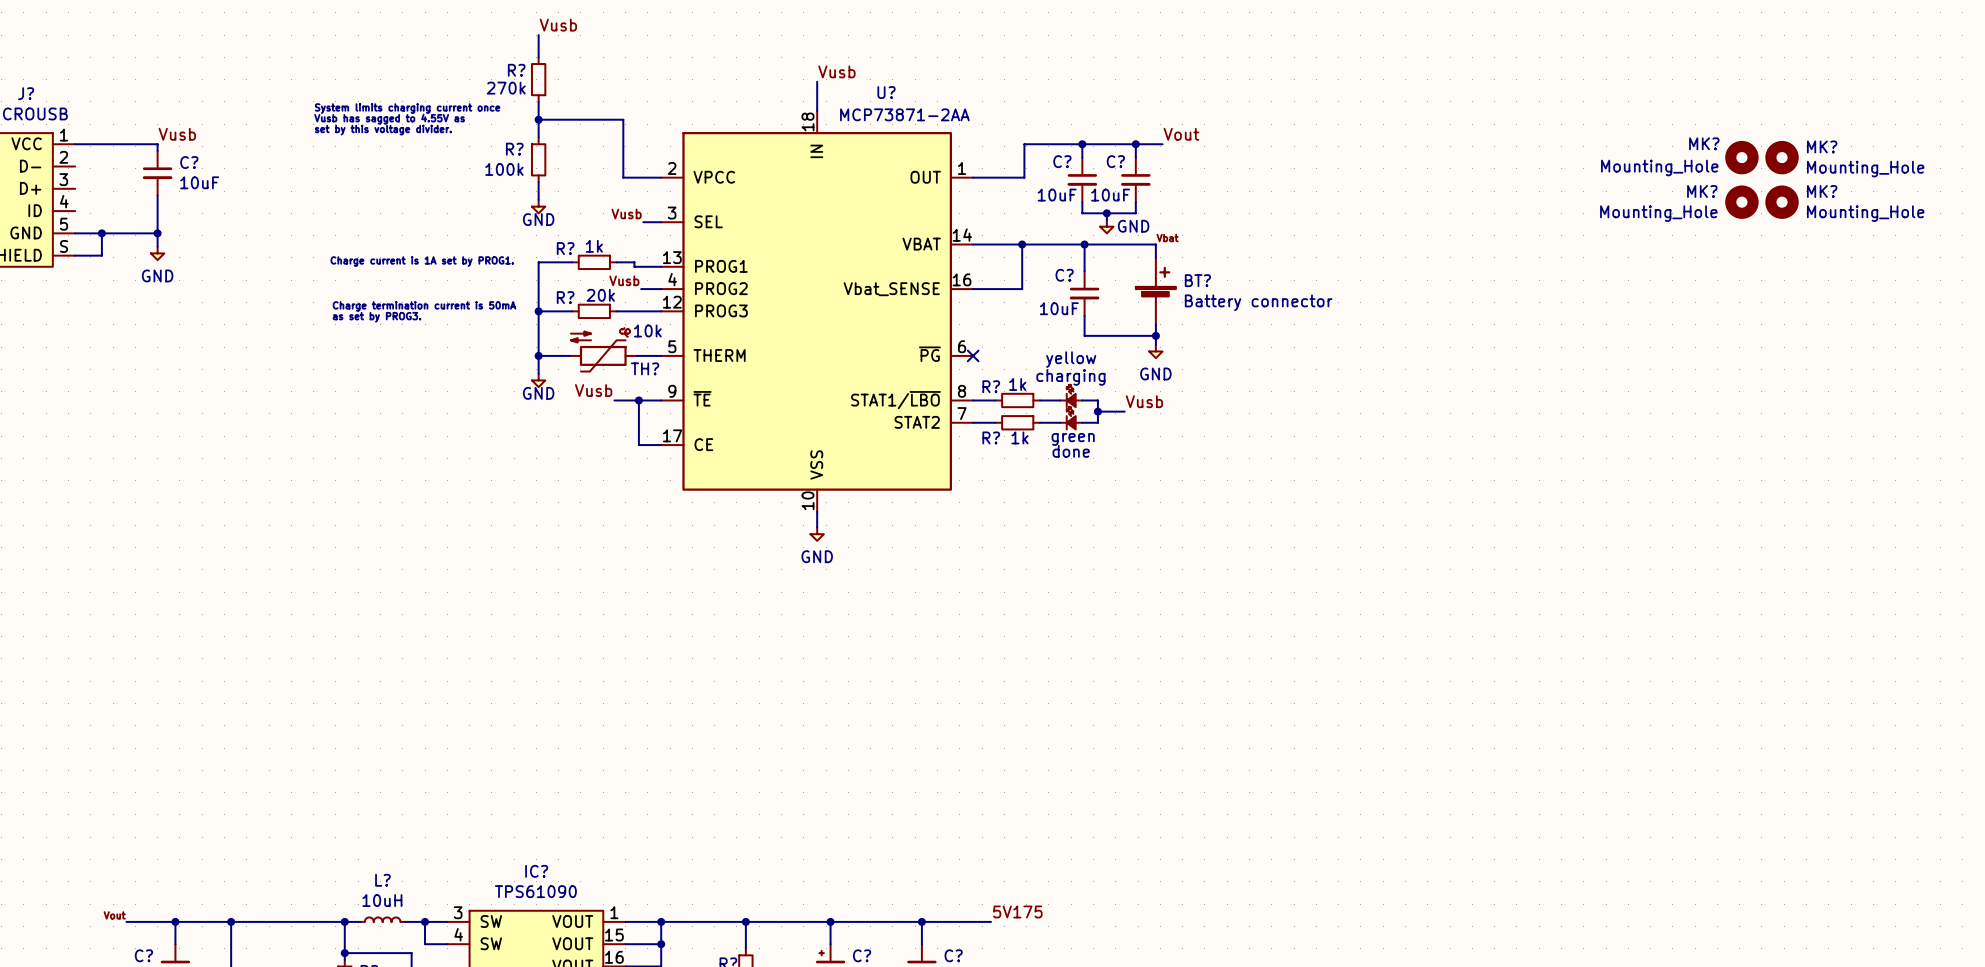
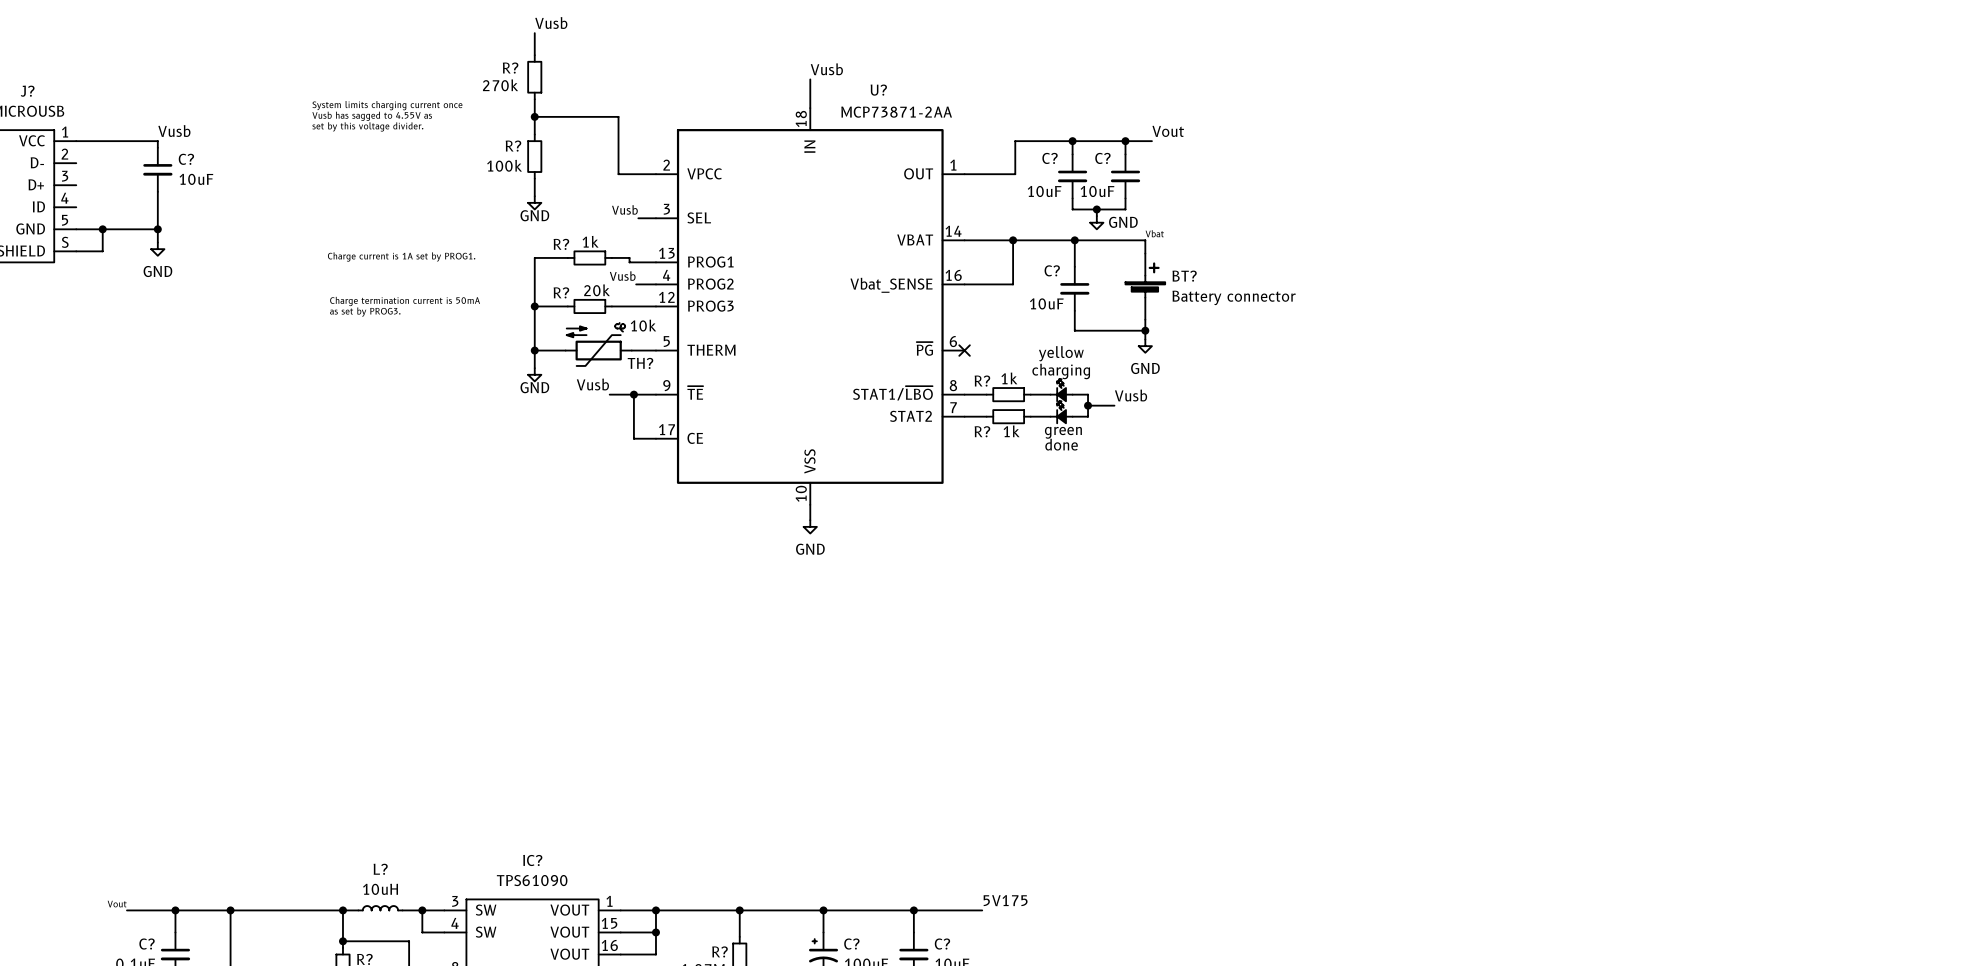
MK?: Mounting_Hole (1741, 157) -> none
MK?: Mounting_Hole (1782, 157) -> none
MK?: Mounting_Hole (1741, 202) -> none
MK?: Mounting_Hole (1782, 202) -> none

